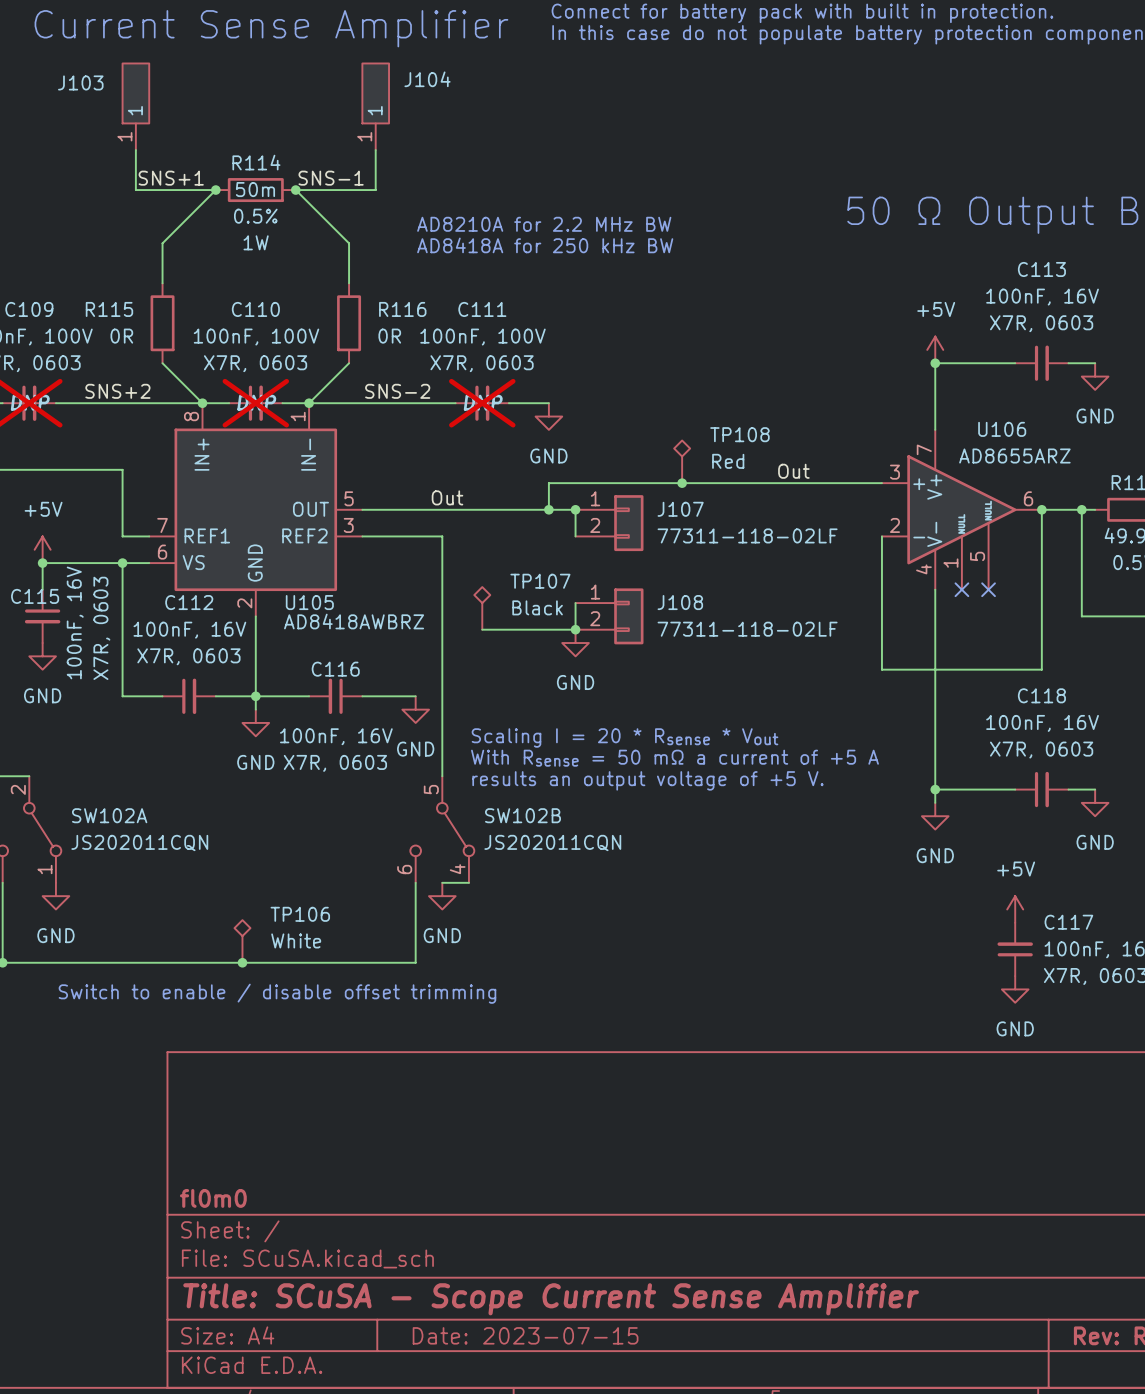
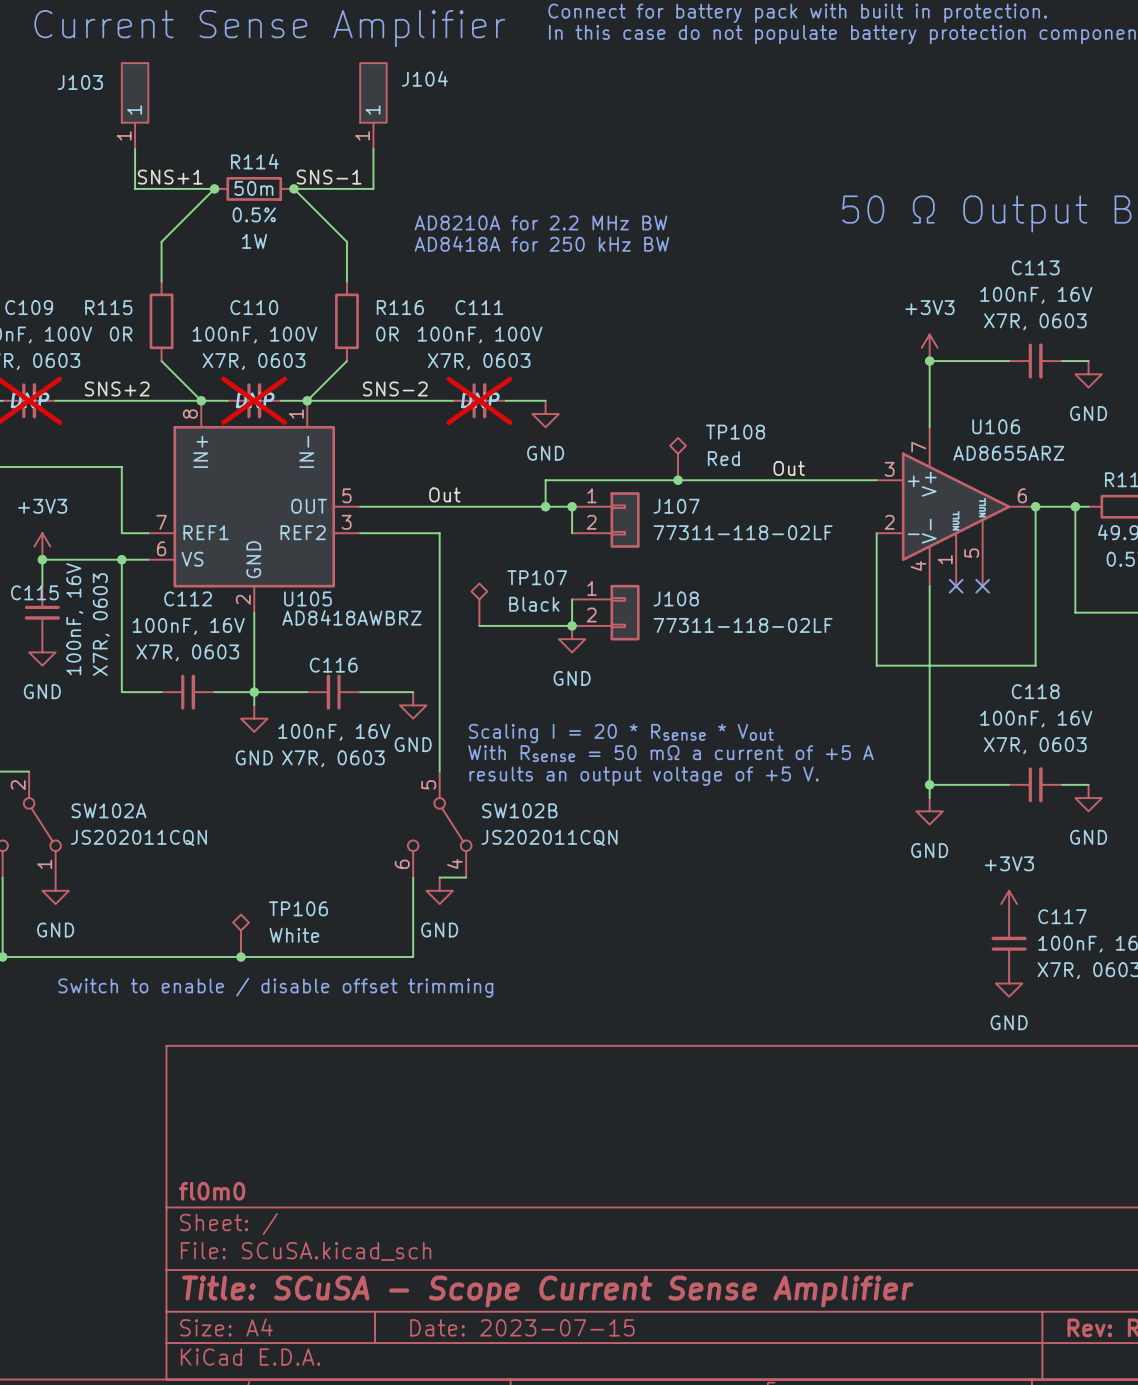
power symbol: +5V (935, 349) -> +3V3 (929, 347)
power symbol: +5V (42, 549) -> +3V3 (42, 546)
power symbol: +5V (1015, 909) -> +3V3 (1009, 904)

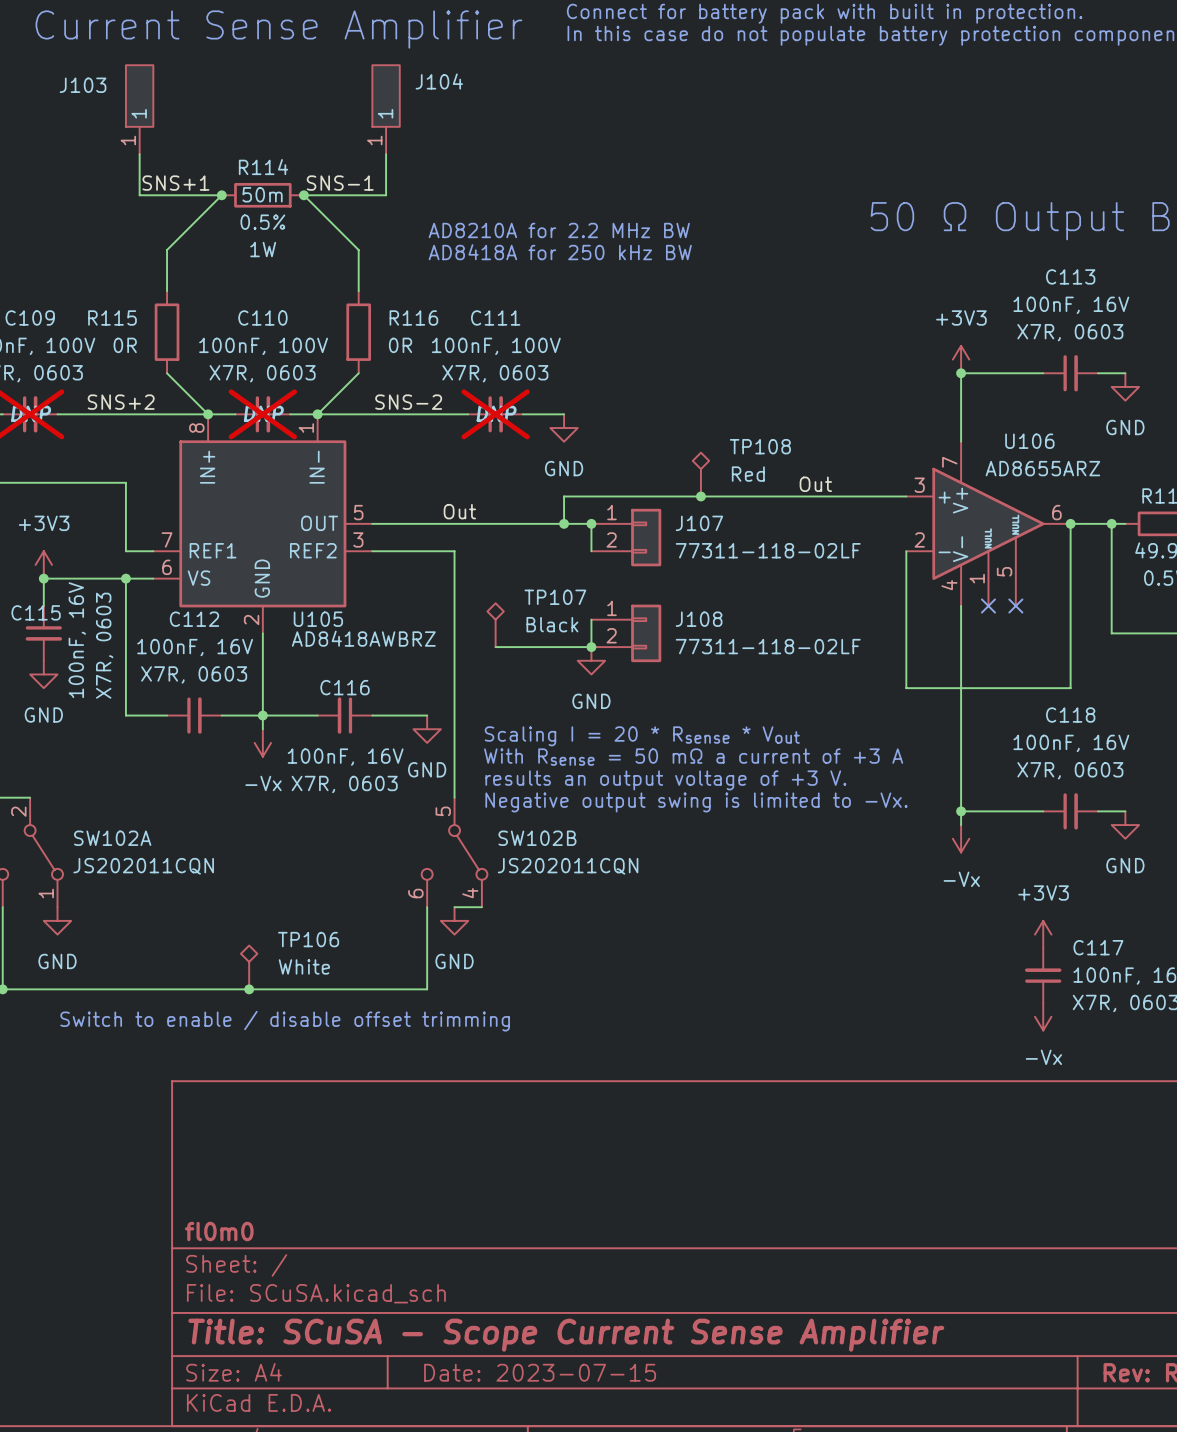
text: none -> Scaling I = 20 * Rsense * Vout (642, 736)
power symbol: GND (254, 718) -> -Vx (262, 742)
text: Scaling I = 20 * Rsense * Vout (621, 733) -> With Rsense = 50 mΩ a current of +3 A (693, 757)
text: With Rsense = 50 mΩ a current of +5 A (670, 753) -> results an output voltage of +3 V. (665, 780)
text: results an output voltage of +5 V. (644, 776) -> Negative output swing is limited to -Vx. (696, 802)
power symbol: GND (929, 811) -> -Vx (961, 838)
power symbol: GND (1009, 983) -> -Vx (1043, 1016)

